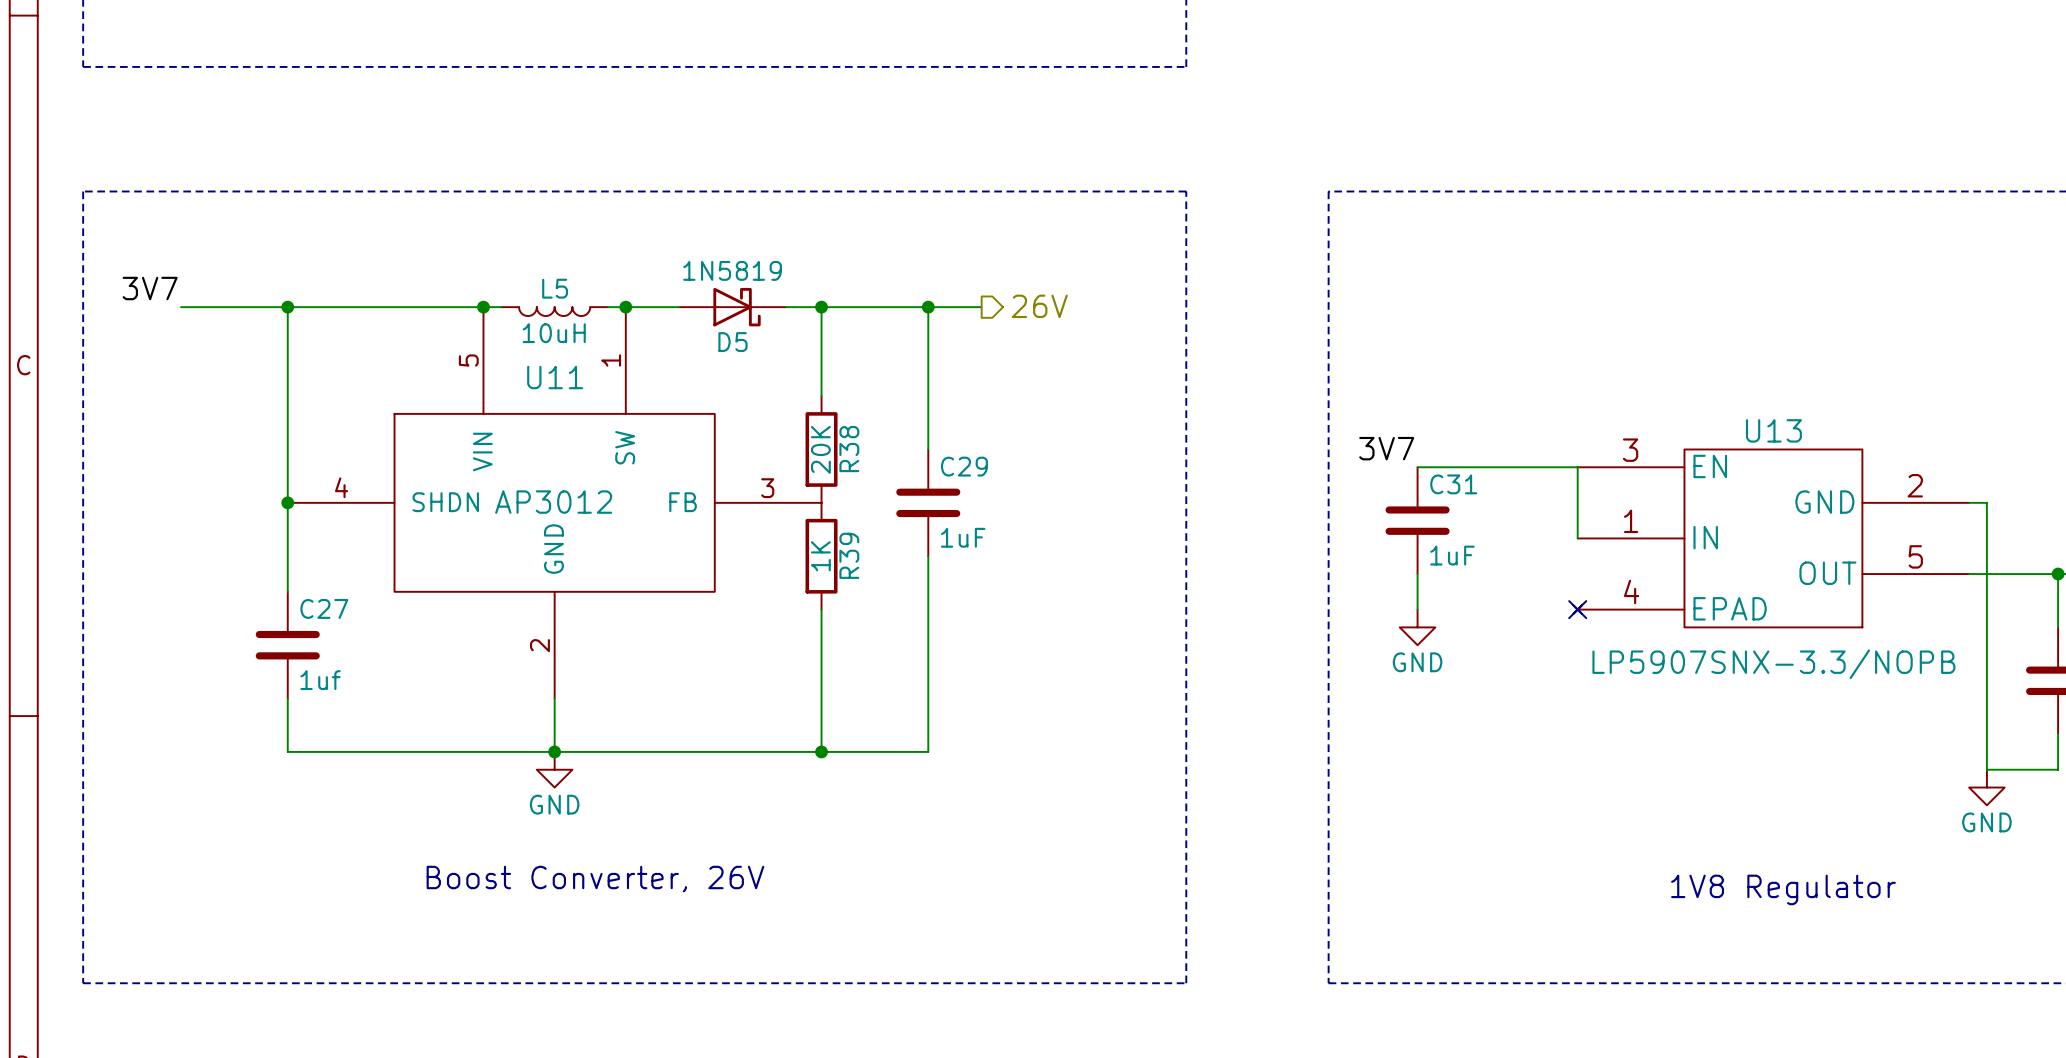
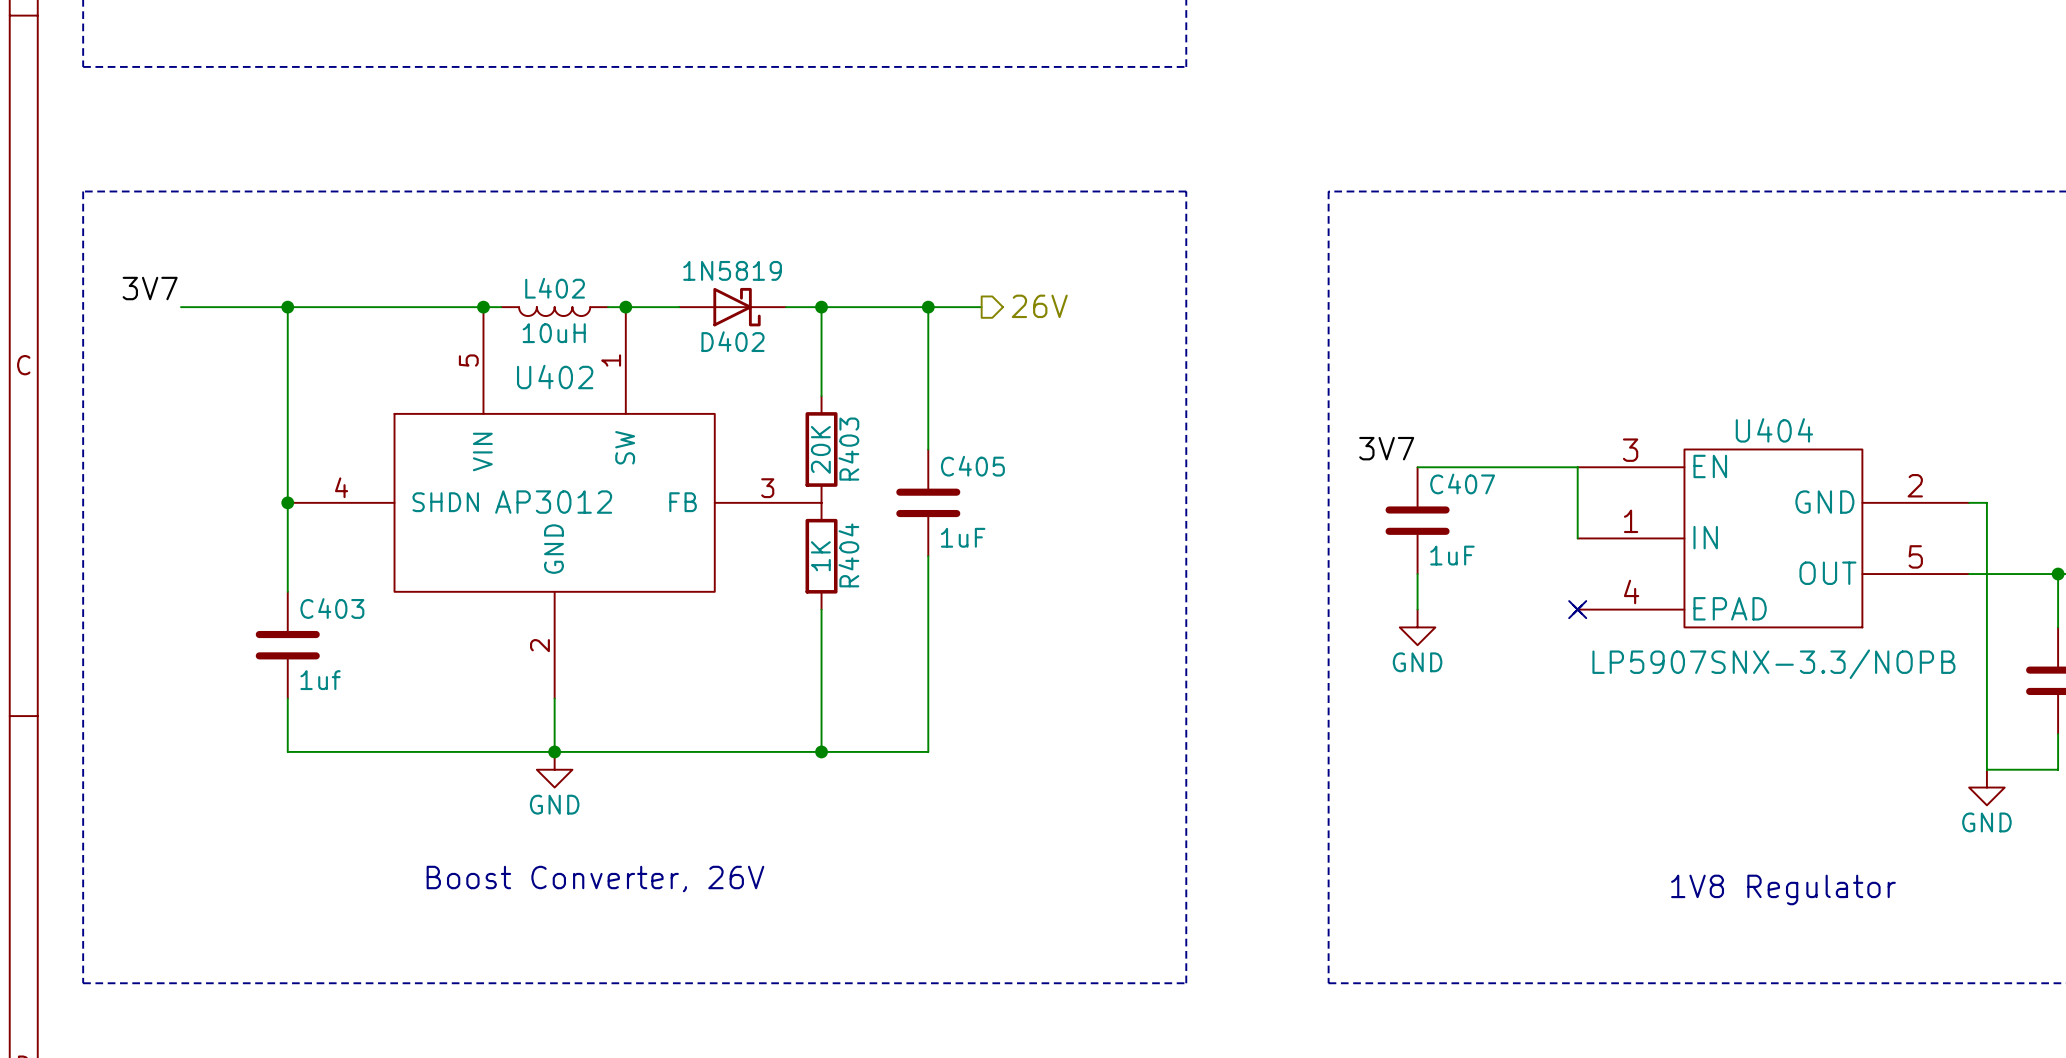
L5 name: L5 (555, 288) -> L402 (555, 288)
D5 name: D5 (732, 342) -> D402 (732, 341)
U11 name: U11 (555, 377) -> U402 (555, 377)
U13 name: U13 (1773, 430) -> U404 (1774, 430)
R38 name: R38 (849, 449) -> R403 (848, 449)
C29 name: C29 (964, 466) -> C405 (972, 466)
C31 name: C31 (1453, 484) -> C407 (1462, 483)
R39 name: R39 (849, 555) -> R404 (848, 555)
C27 name: C27 (324, 608) -> C403 (332, 608)

